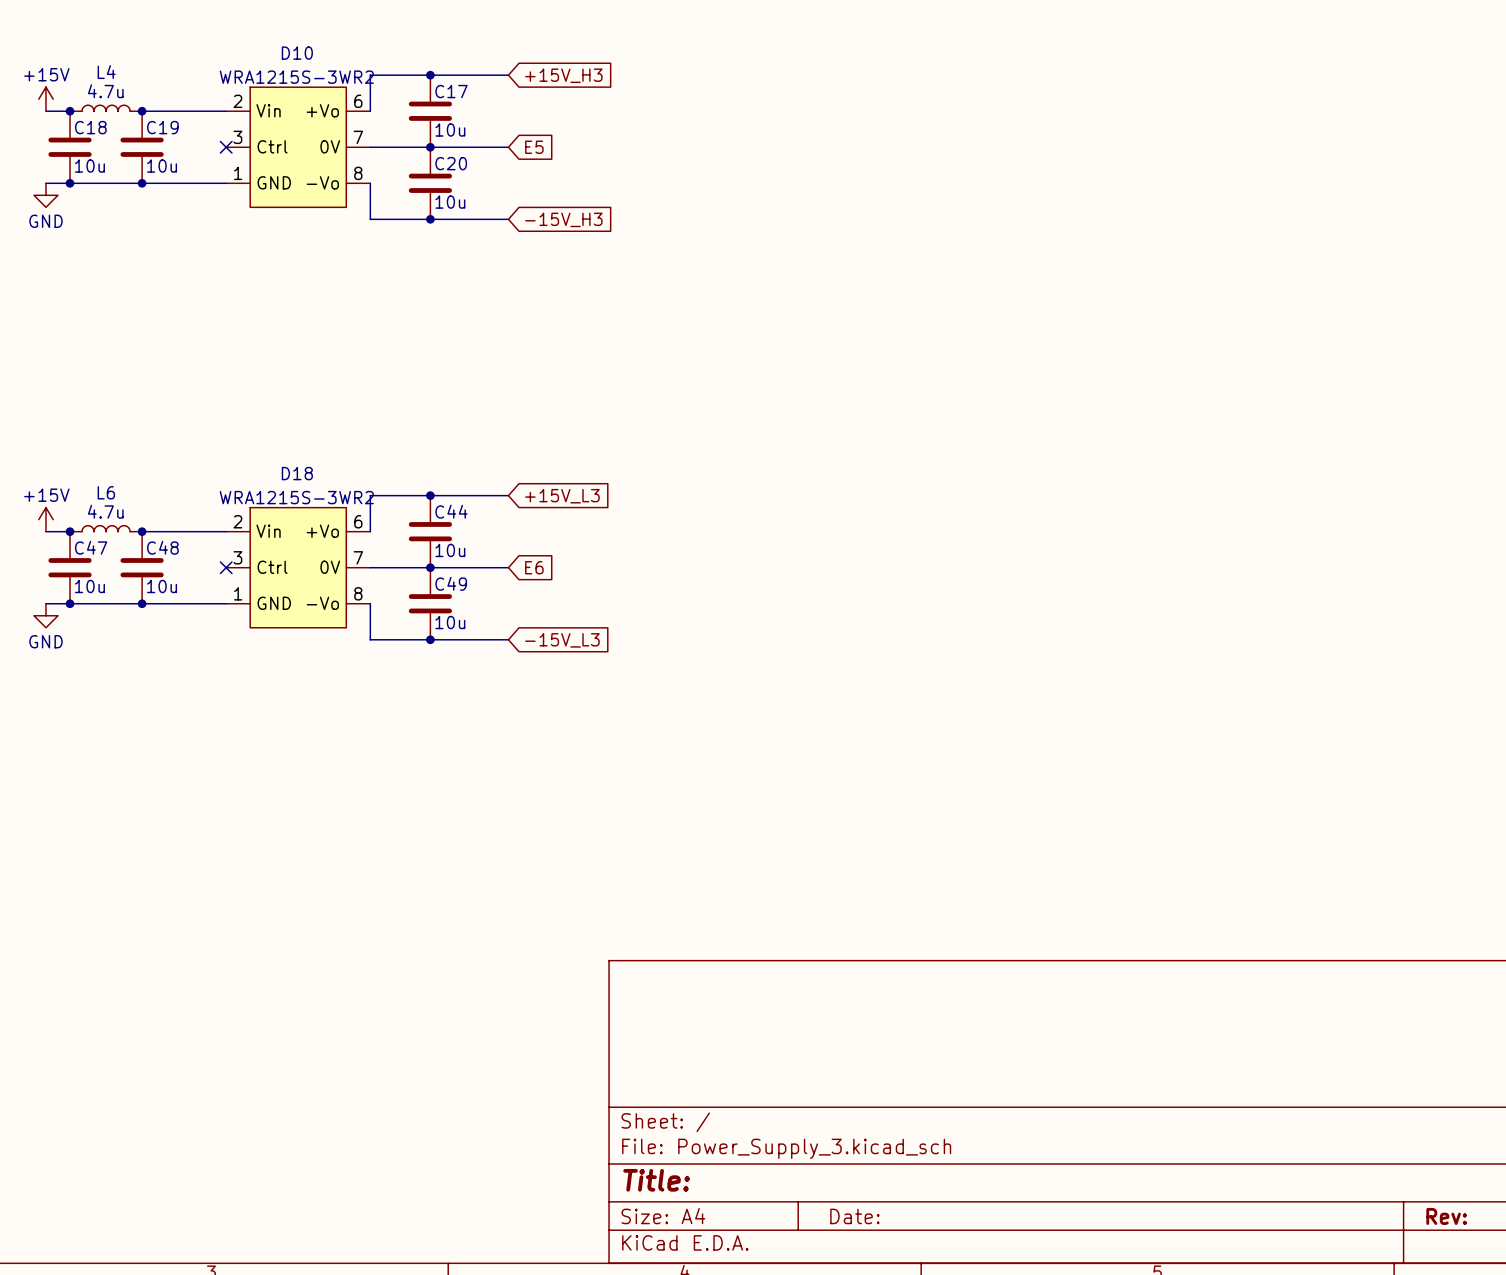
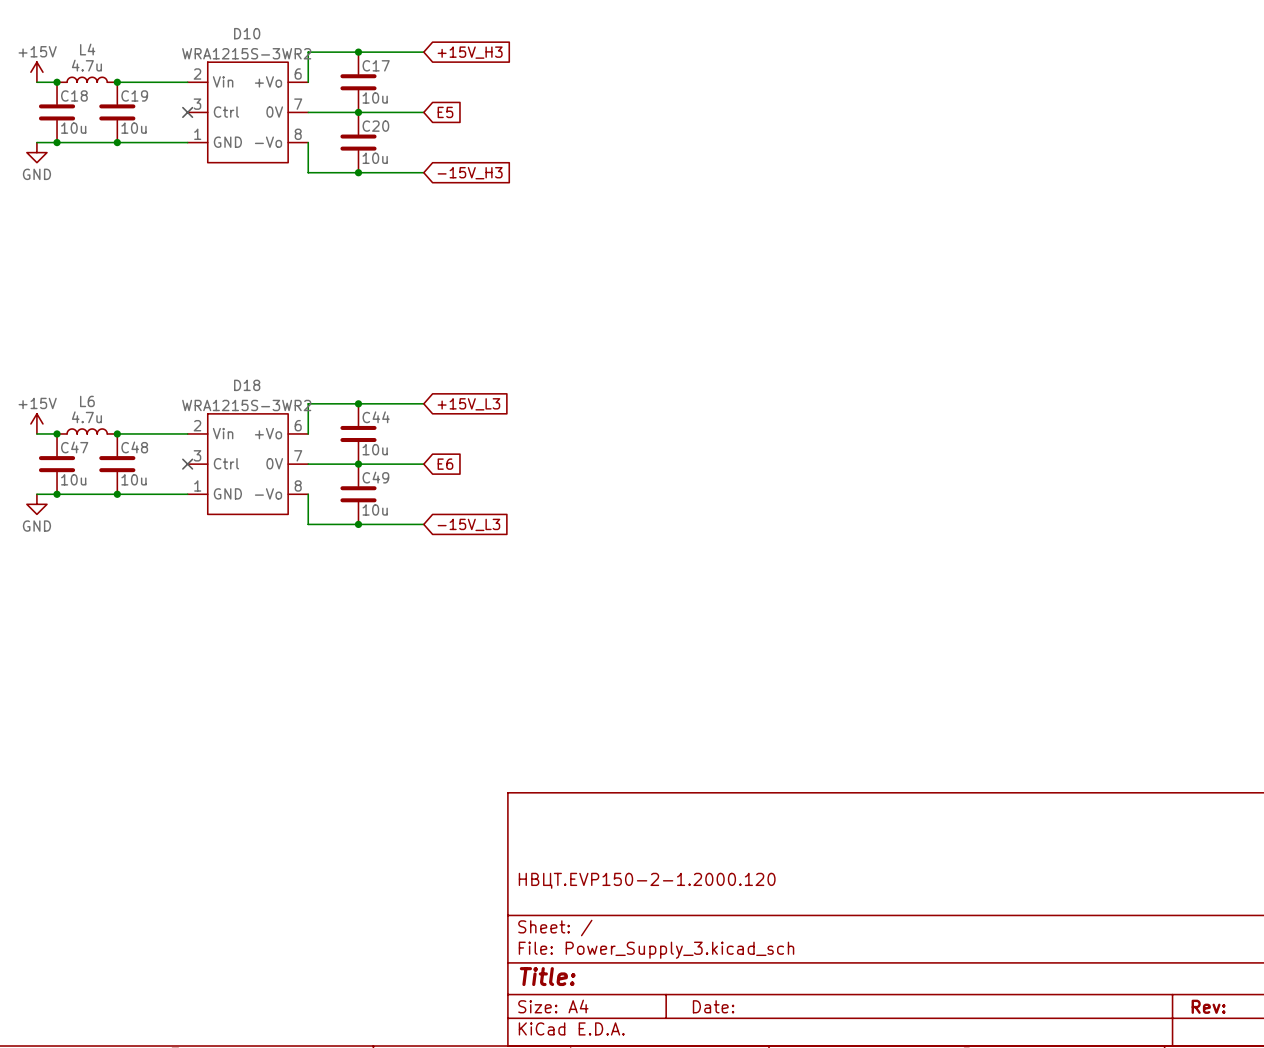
title block: none -> НВЦТ.EVP150-2-1.2000.120 (647, 880)

